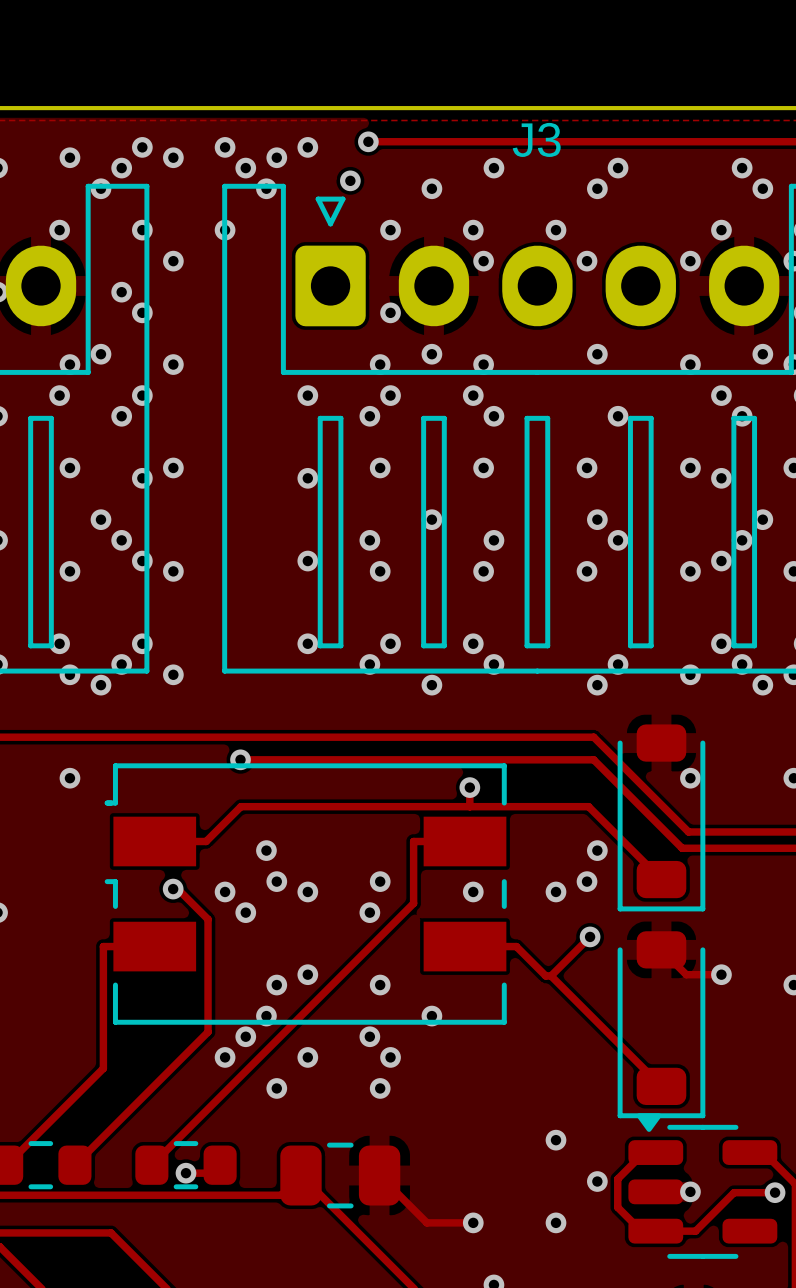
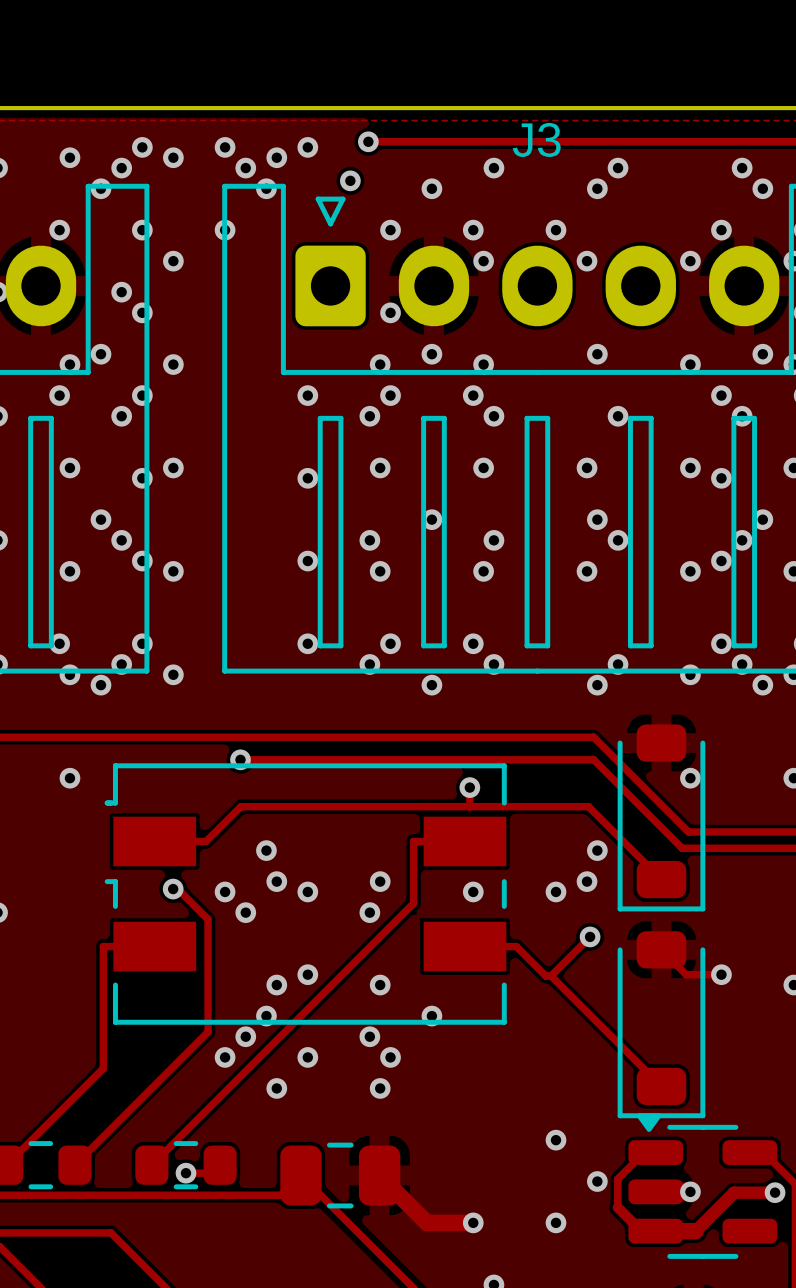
track width: thin (379, 1175) (426, 1222) (473, 1222) -> thick (379, 1175) (426, 1222) (473, 1222)
track width: thin (775, 1192) (734, 1192) (695, 1231) (641, 1231) (617, 1207) -> thick (775, 1192) (734, 1192) (695, 1231) (641, 1231) (617, 1207)

